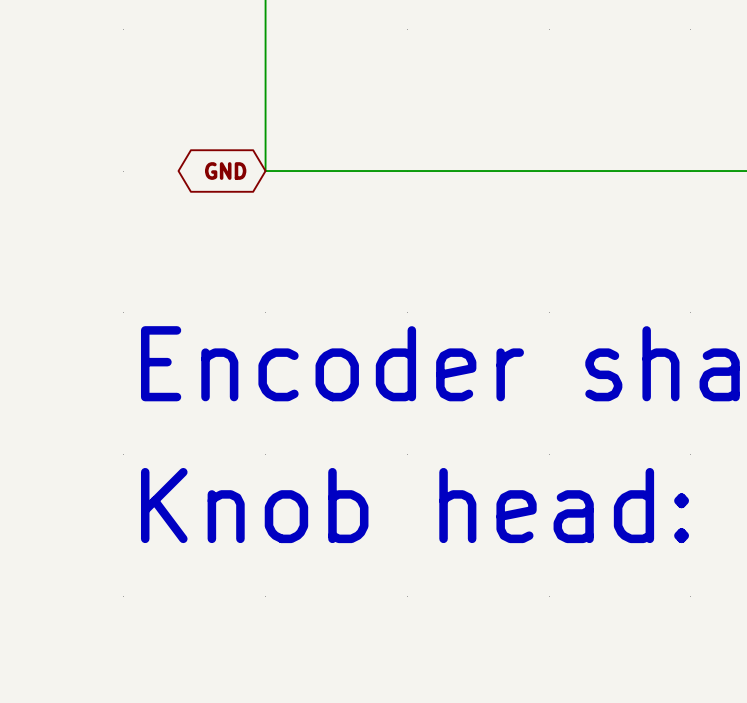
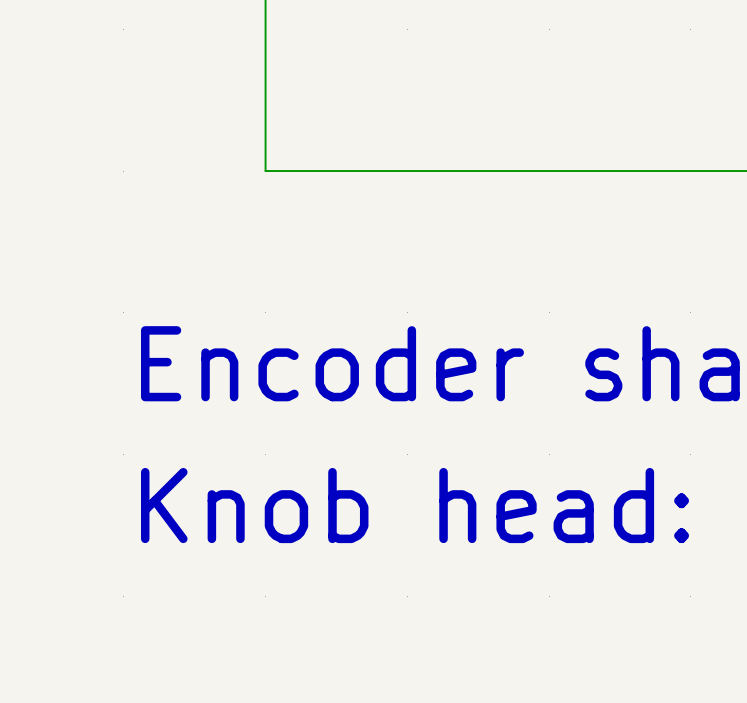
global label: GND (225, 171) -> none

